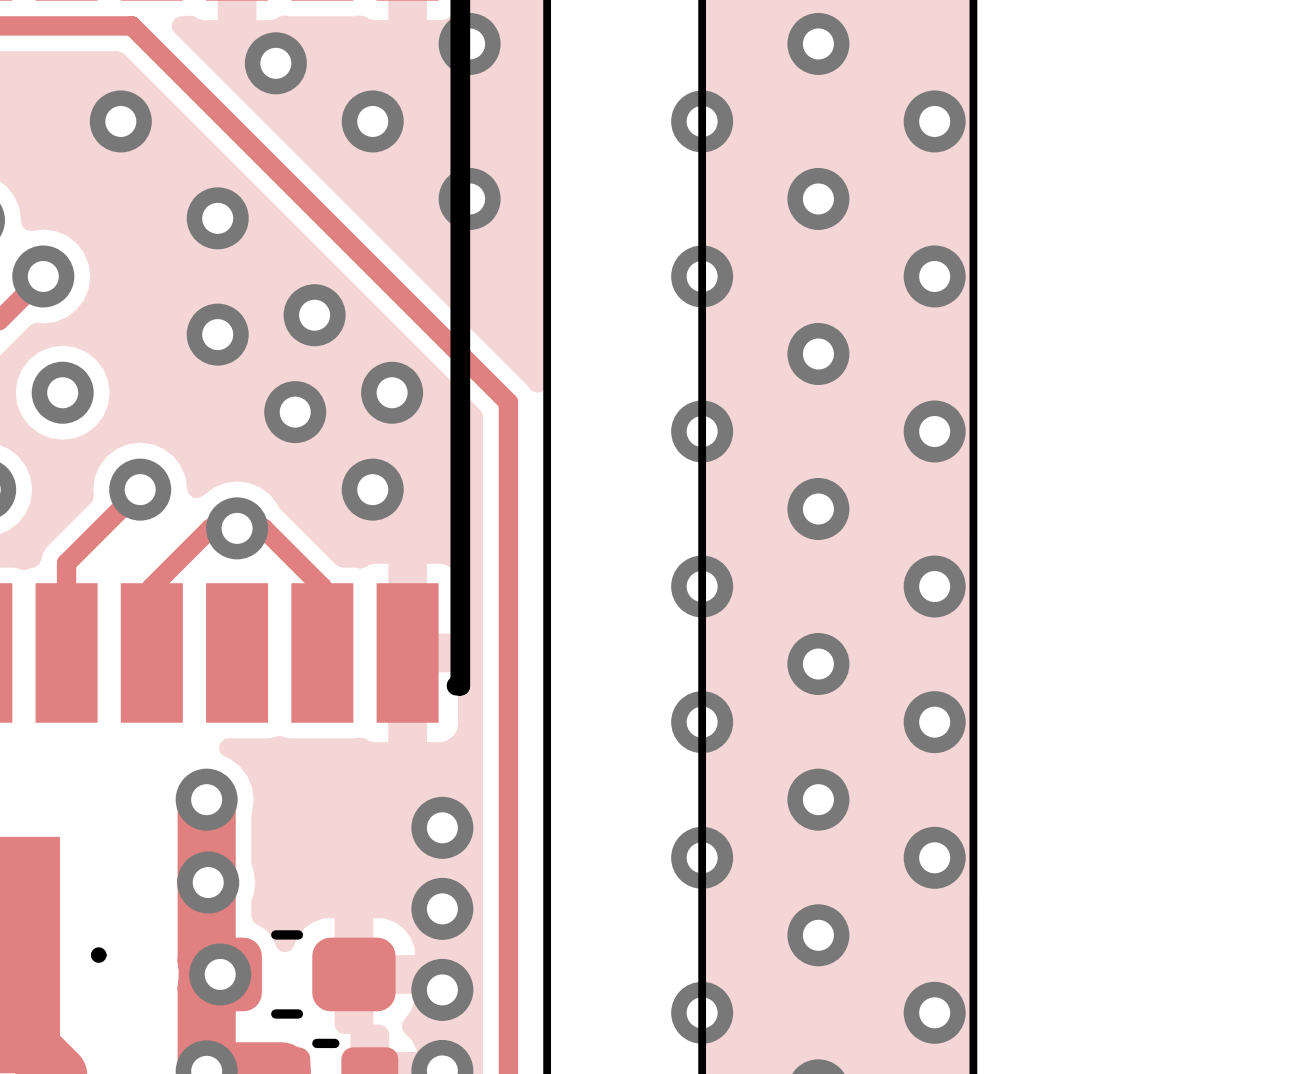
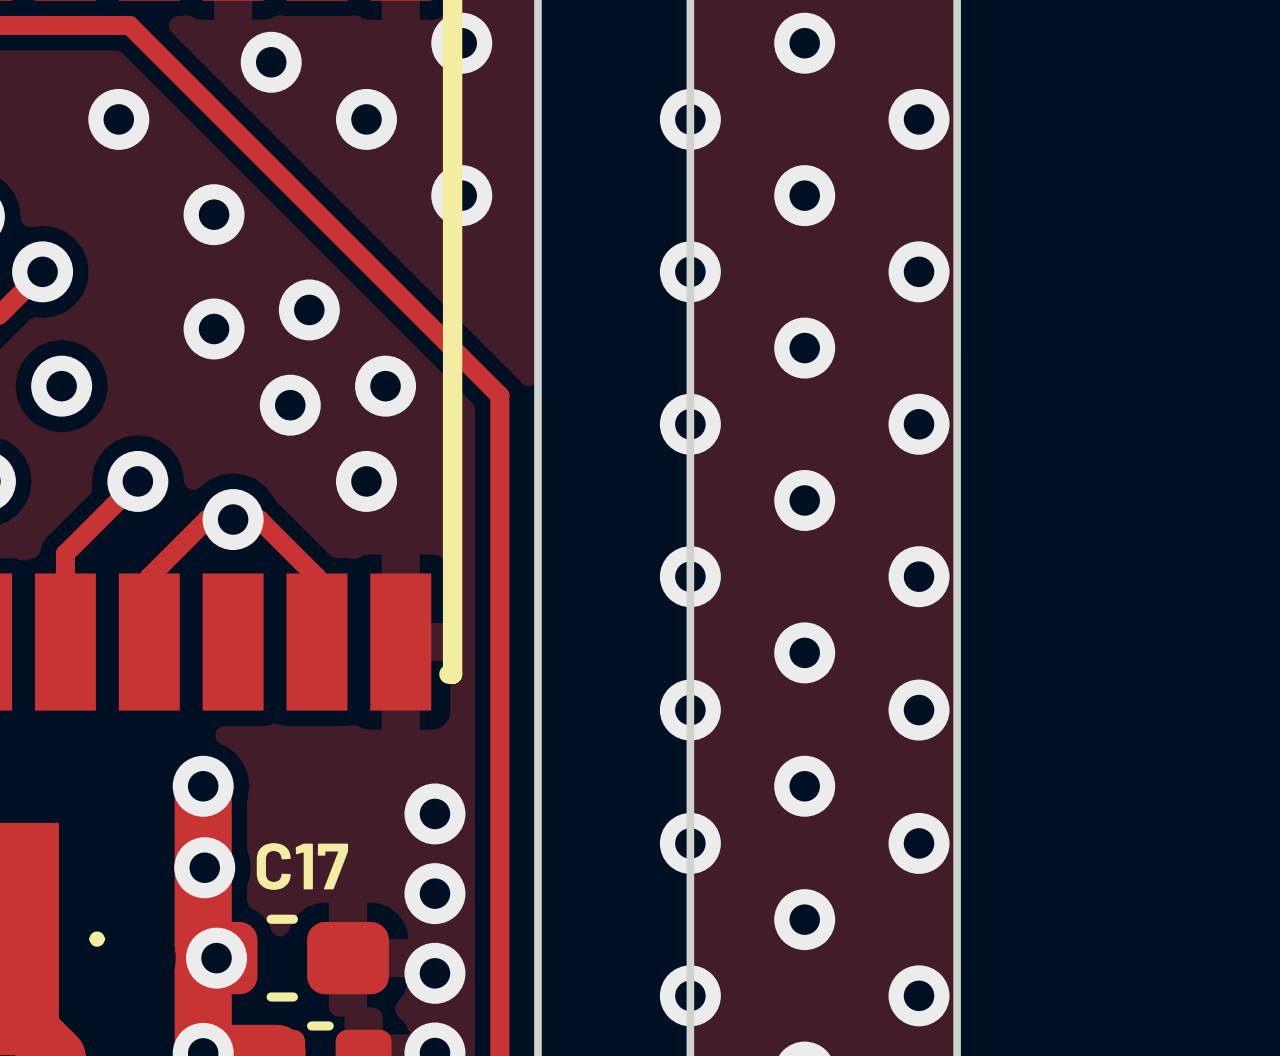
C17 name: none -> C17 (302, 866)

